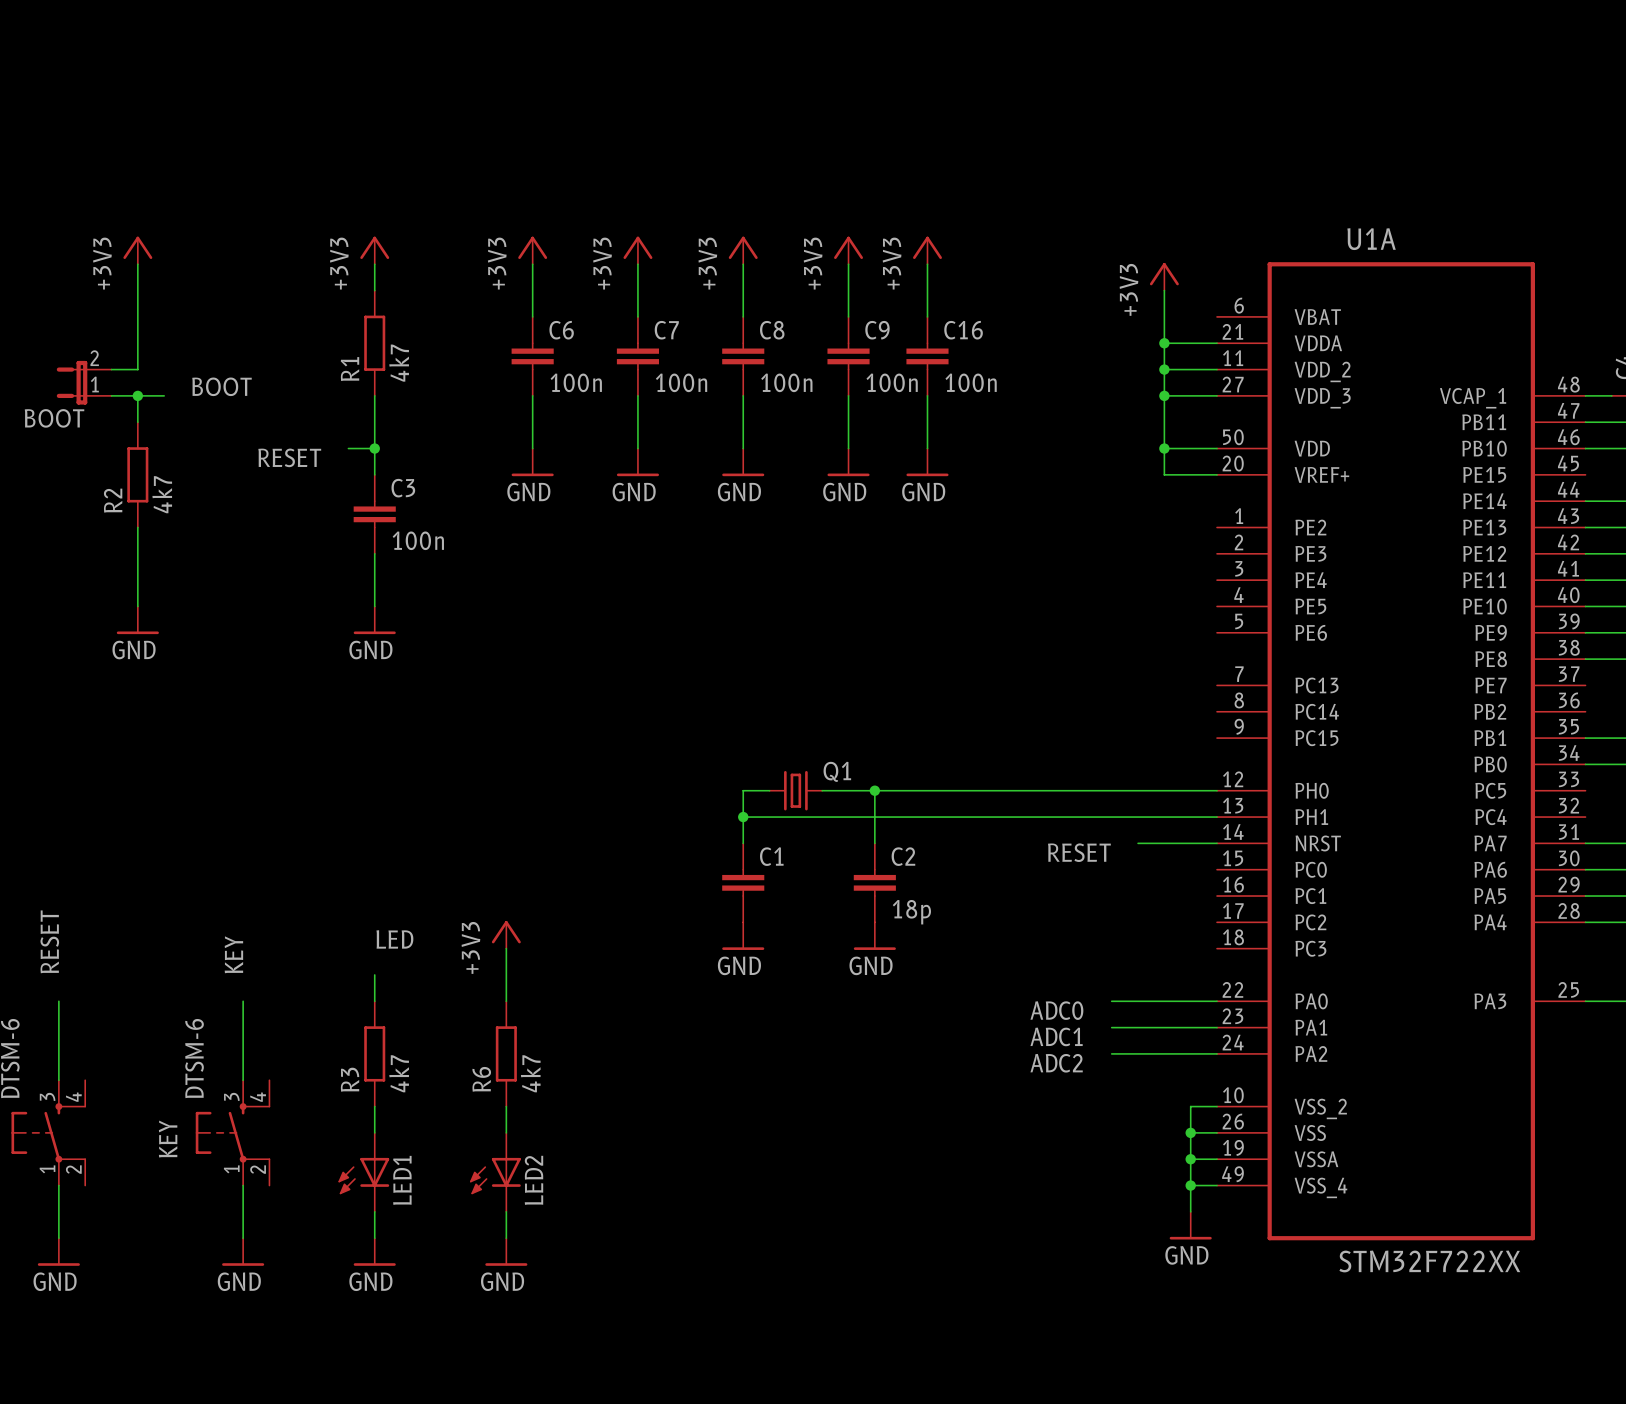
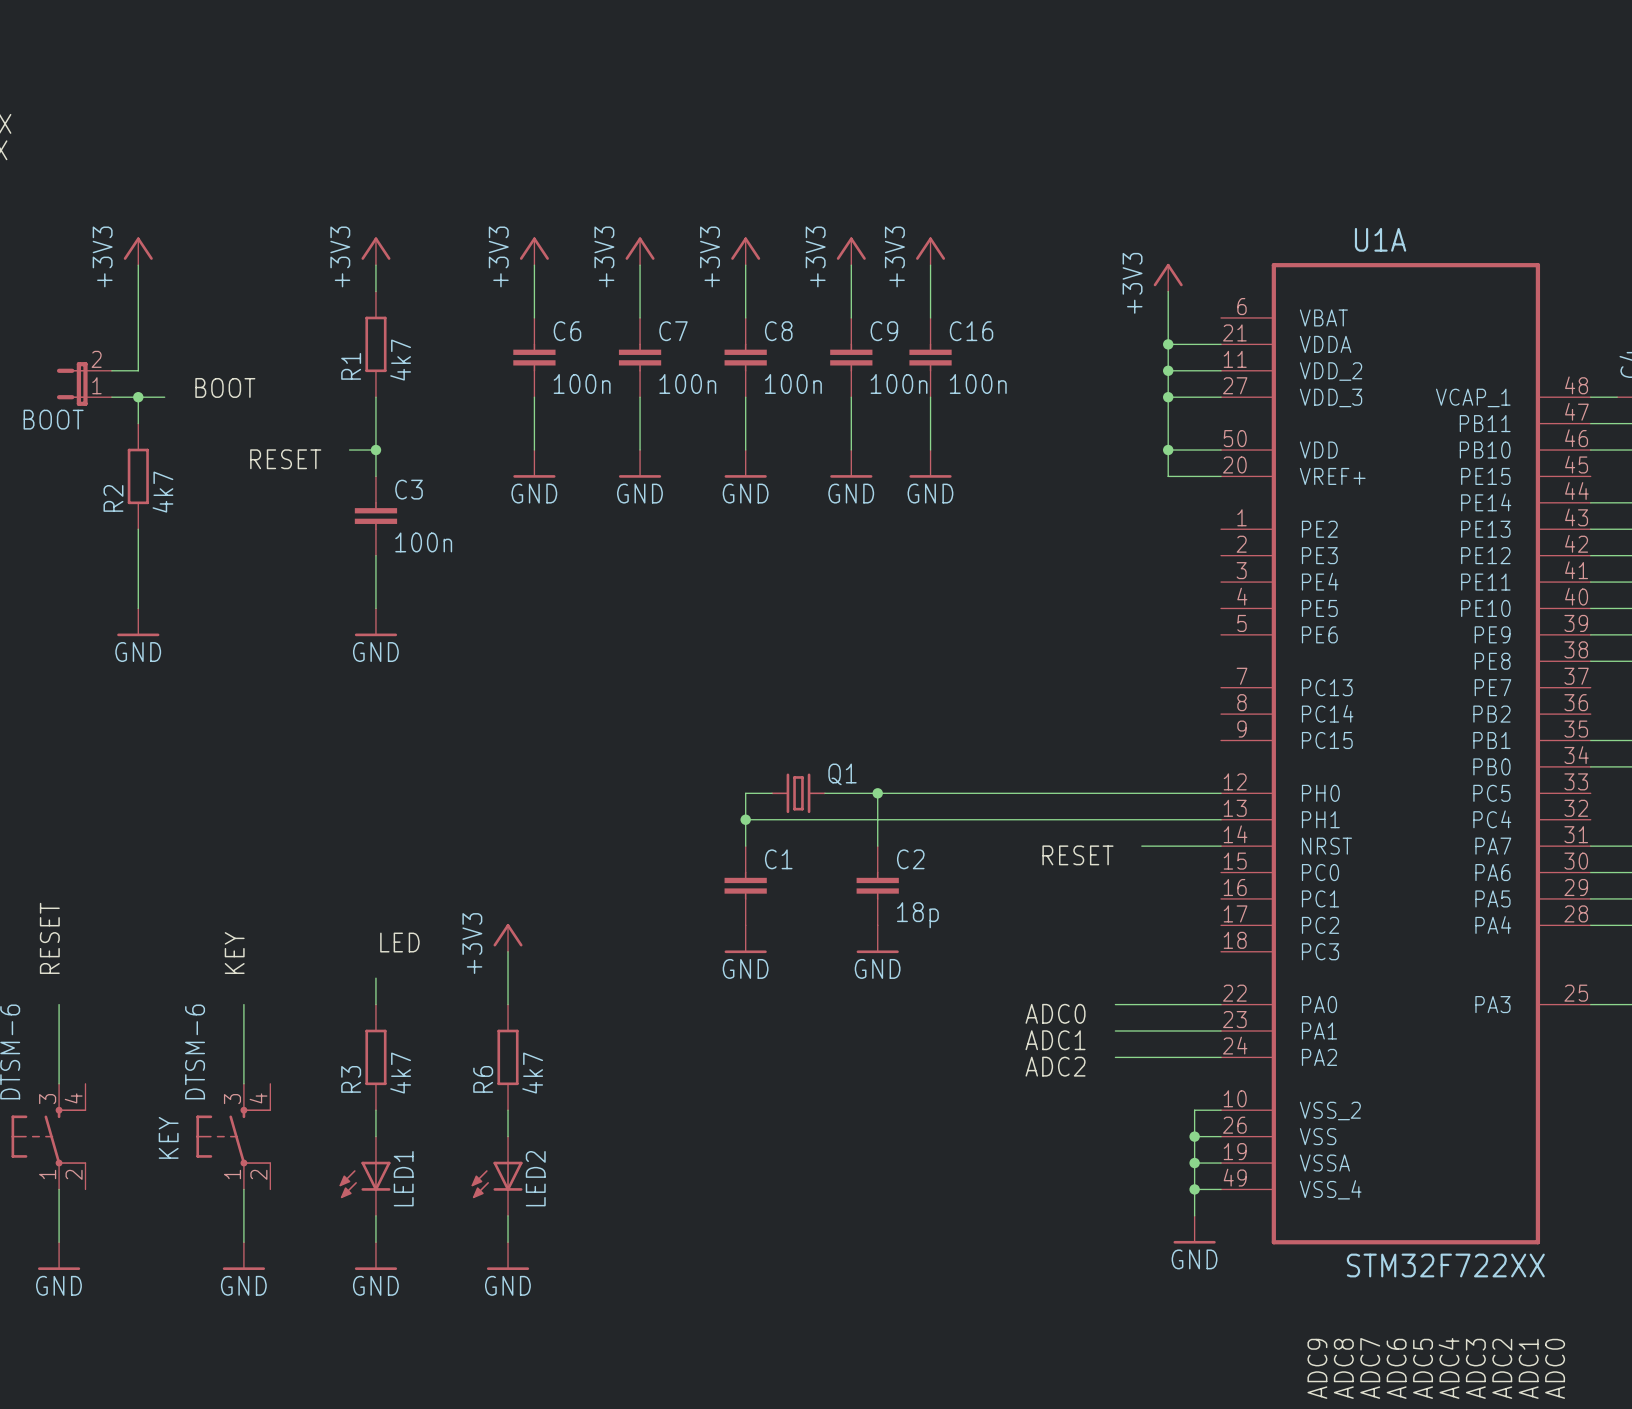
label: none -> ADC9 (1317, 1368)
label: none -> ADC8 (1343, 1368)
label: none -> ADC6 (1396, 1368)
label: none -> ADC7 (1370, 1368)
label: none -> ADC5 (1423, 1368)
label: none -> ADC4 (1449, 1368)
label: none -> ADC3 (1475, 1368)
label: none -> ADC2 (1502, 1368)
label: none -> ADC1 (1528, 1368)
label: none -> ADC0 (1555, 1368)

